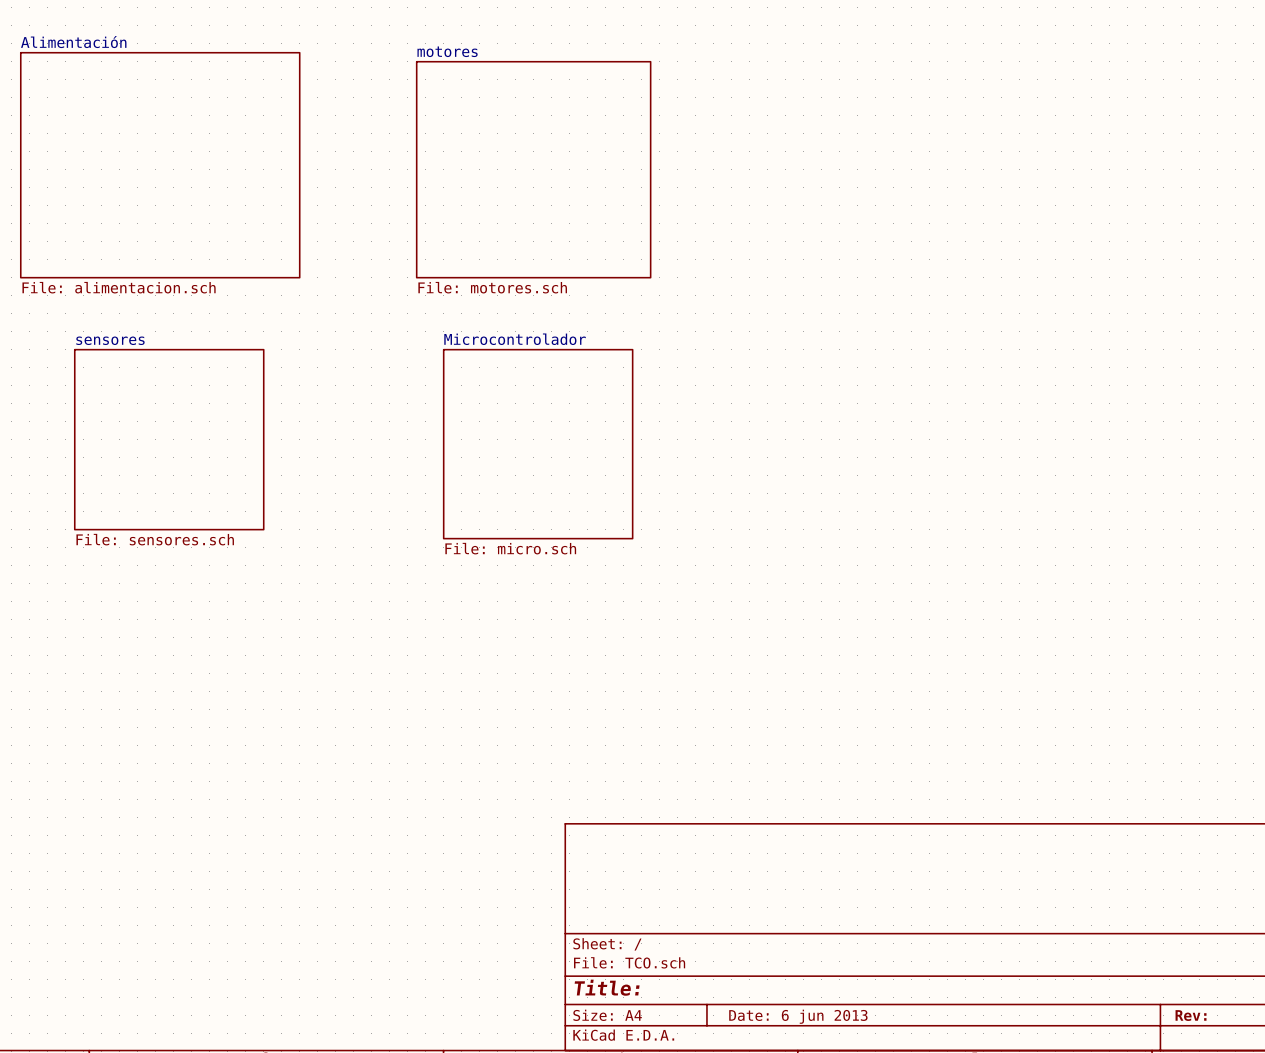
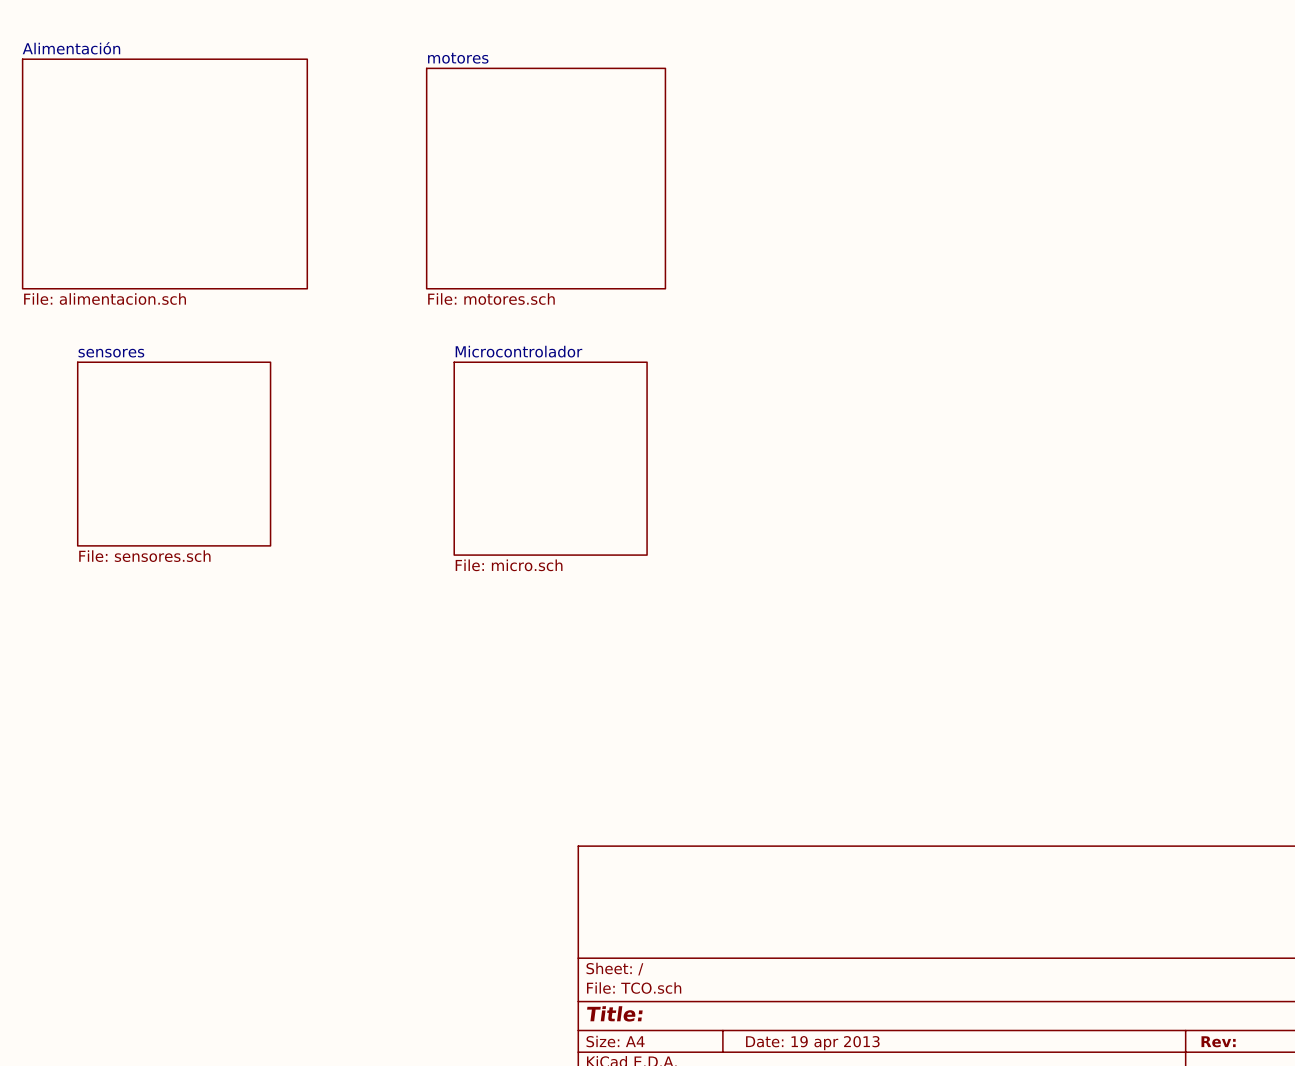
title block: Date: 6 jun 2013 (798, 1016) -> Date: 19 apr 2013 (812, 1043)

